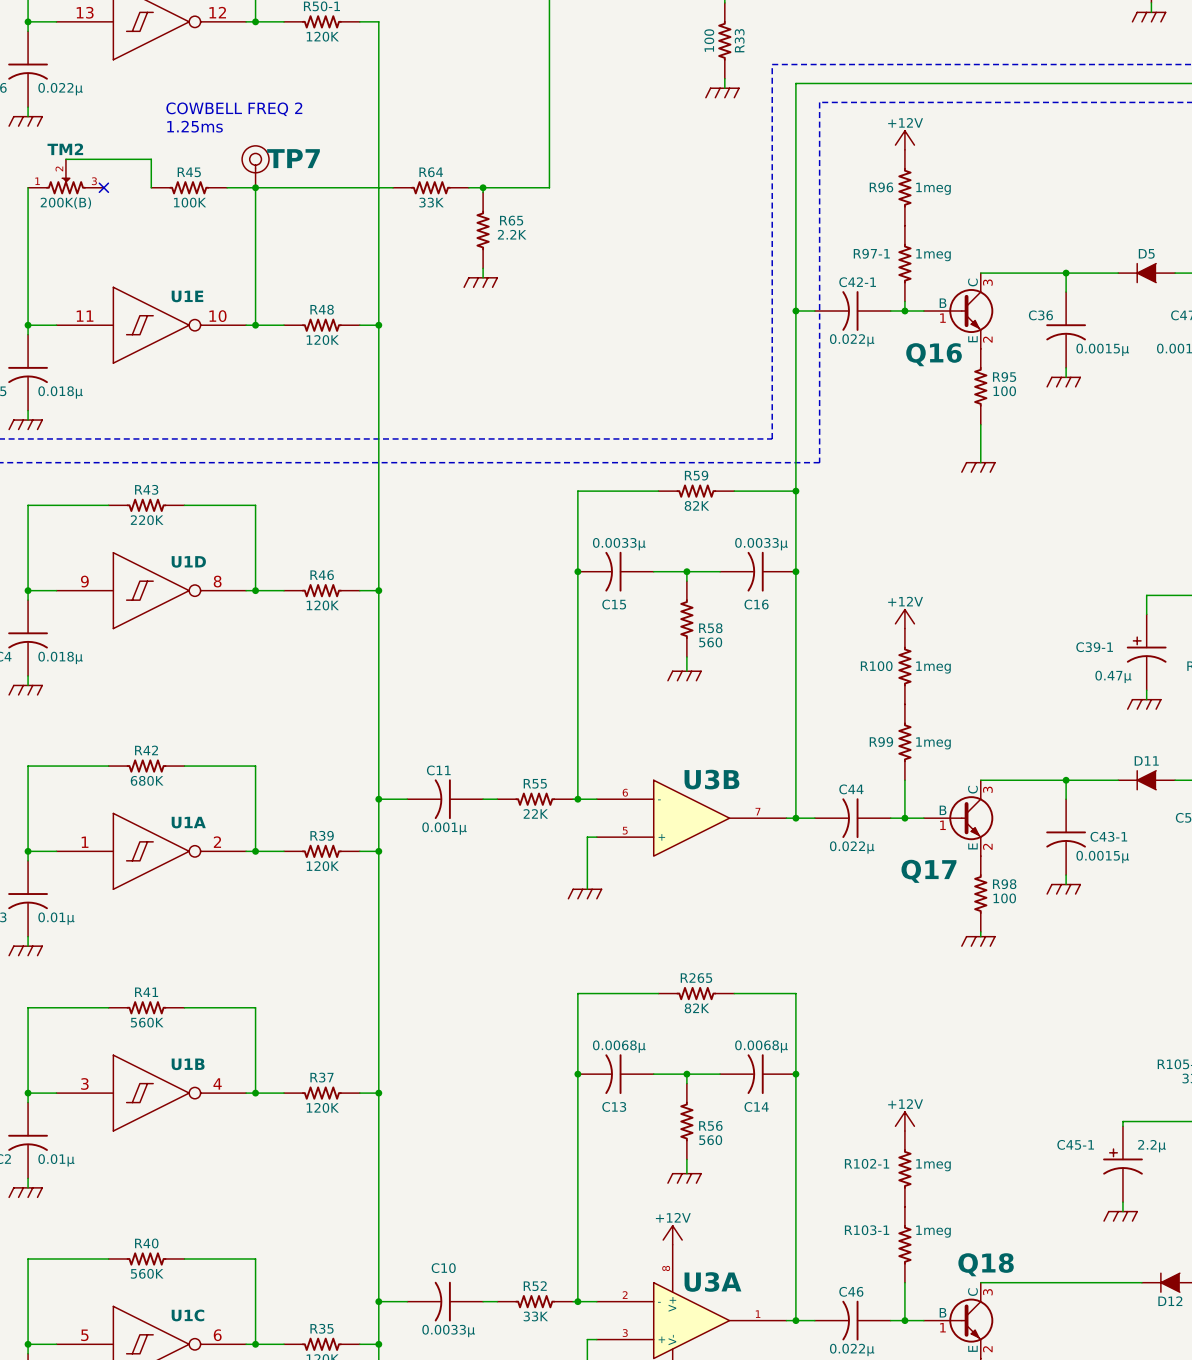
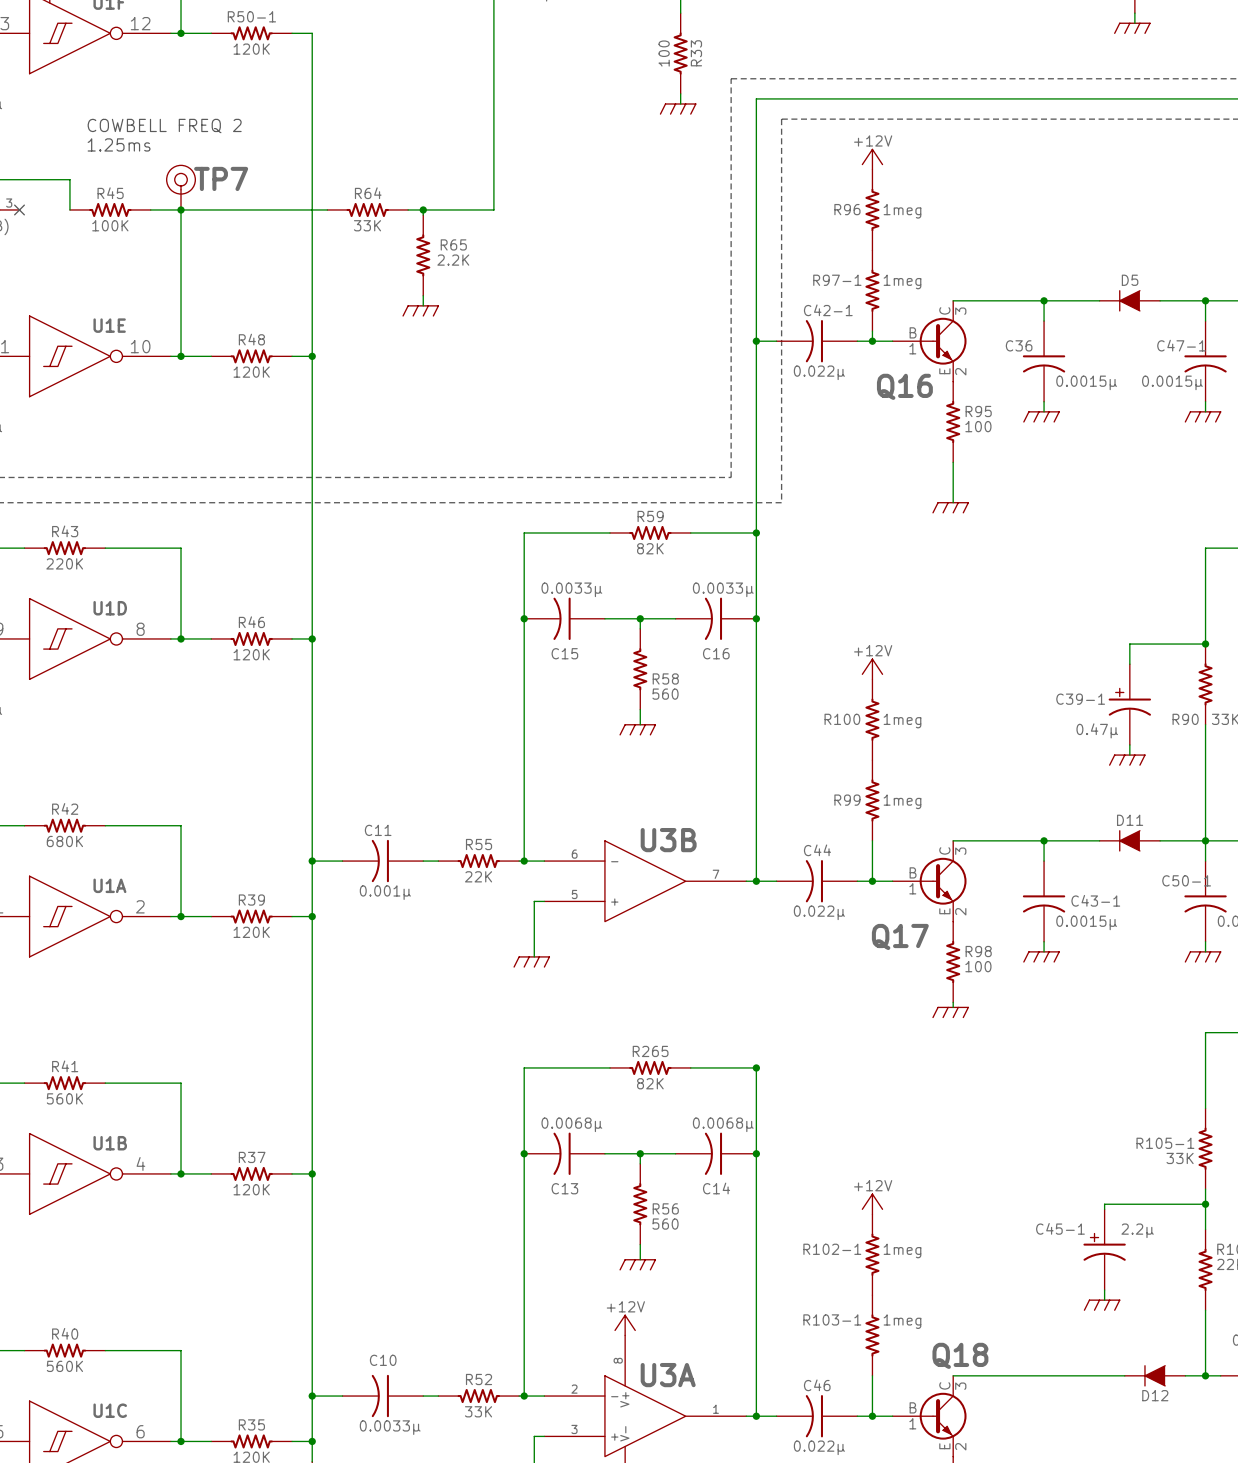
junction: none -> (756, 1067)

